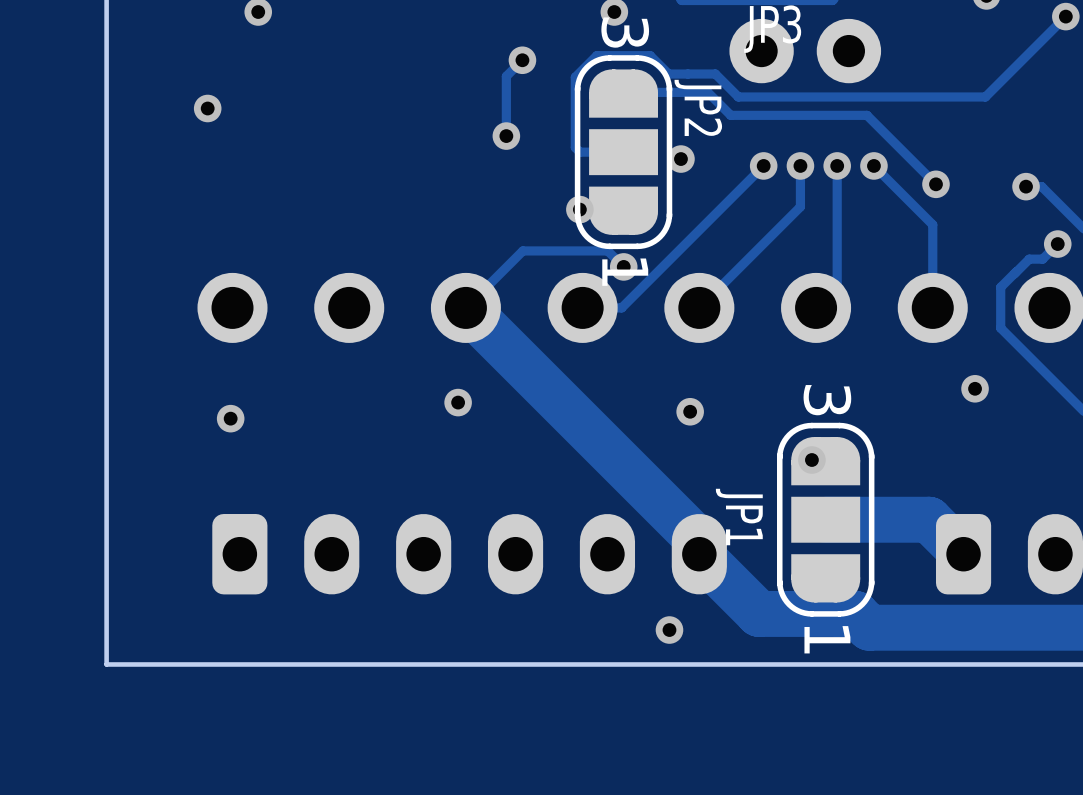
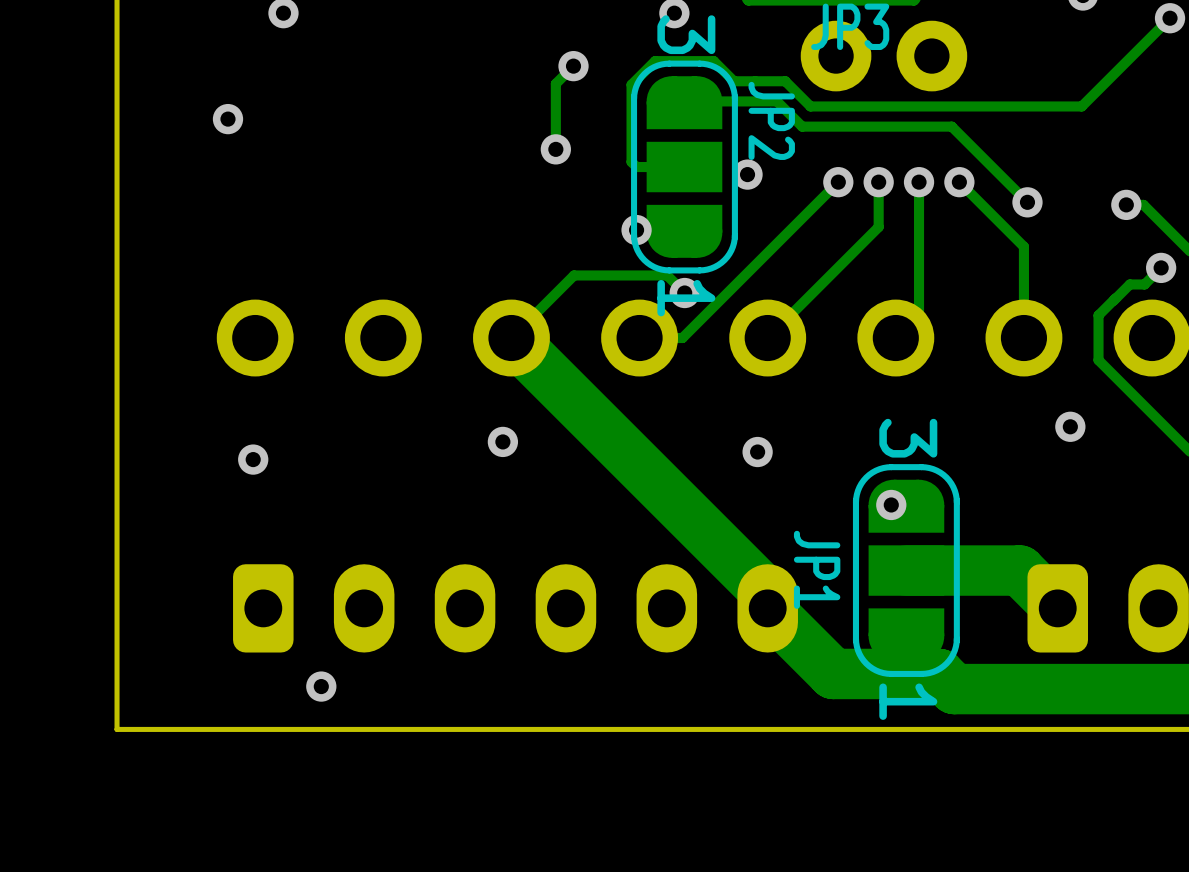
via: none -> (321, 686)
via: (669, 630) -> none

